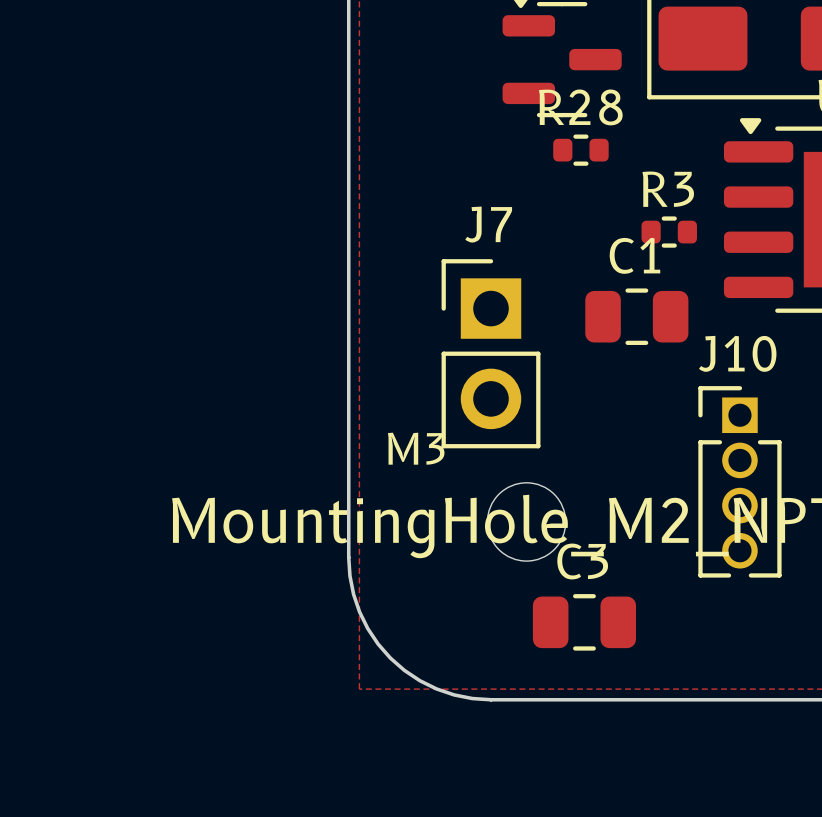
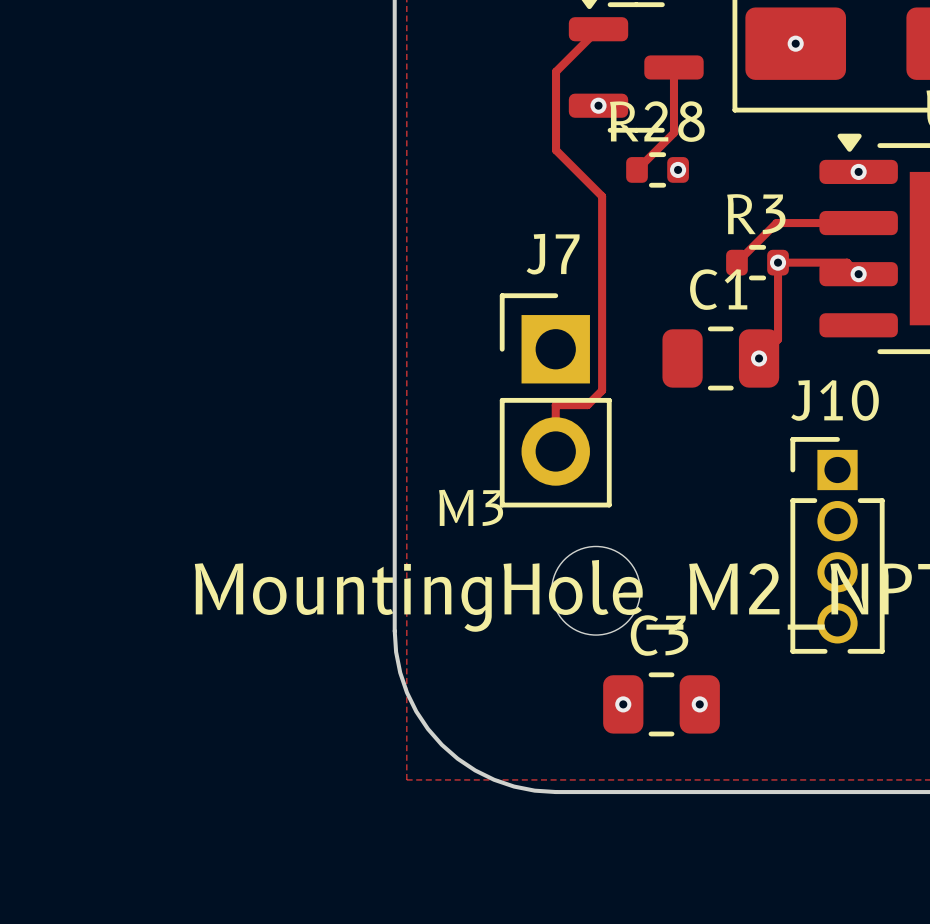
track: none -> (598, 29) (556, 71) (556, 150) (602, 196) (602, 390) (587, 405) (555, 405) (555, 451)
via: none -> (795, 43)
track: none -> (673, 67) (673, 132) (637, 169)
via: none -> (598, 105)
via: none -> (678, 169)
via: none -> (858, 171)
track: none -> (858, 223) (776, 223) (736, 262)
via: none -> (778, 262)
track: none -> (858, 274) (847, 262) (778, 262) (778, 339) (759, 358)
via: none -> (858, 274)
via: none -> (759, 358)
via: none -> (623, 704)
via: none -> (699, 704)

